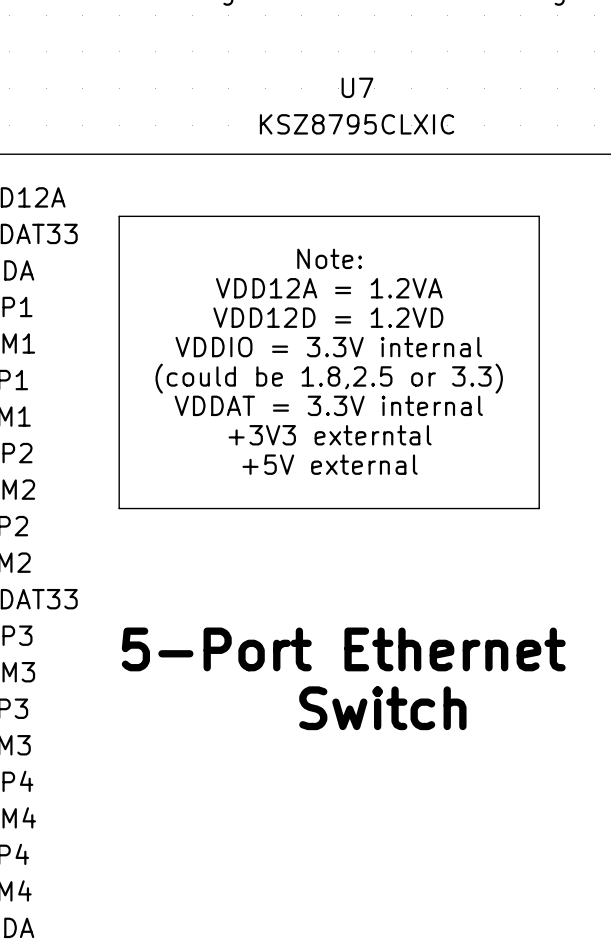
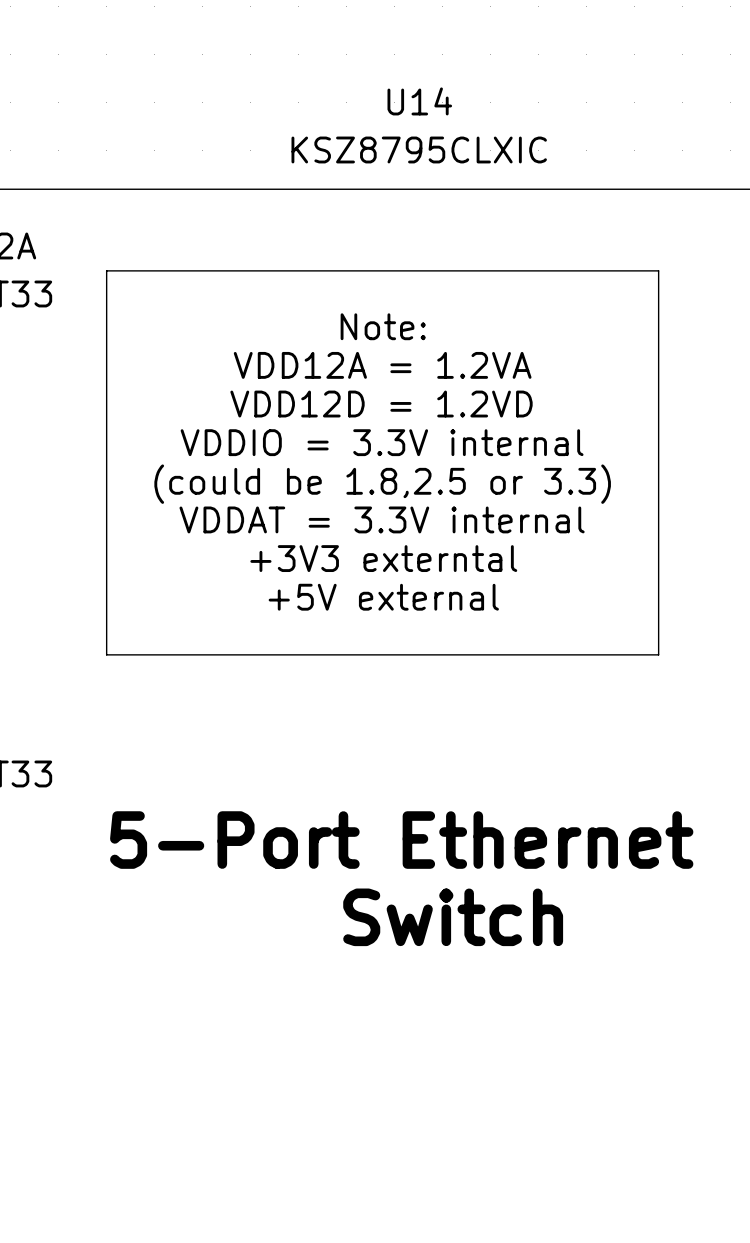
U7 name: U7 (357, 87) -> U14 (419, 101)

